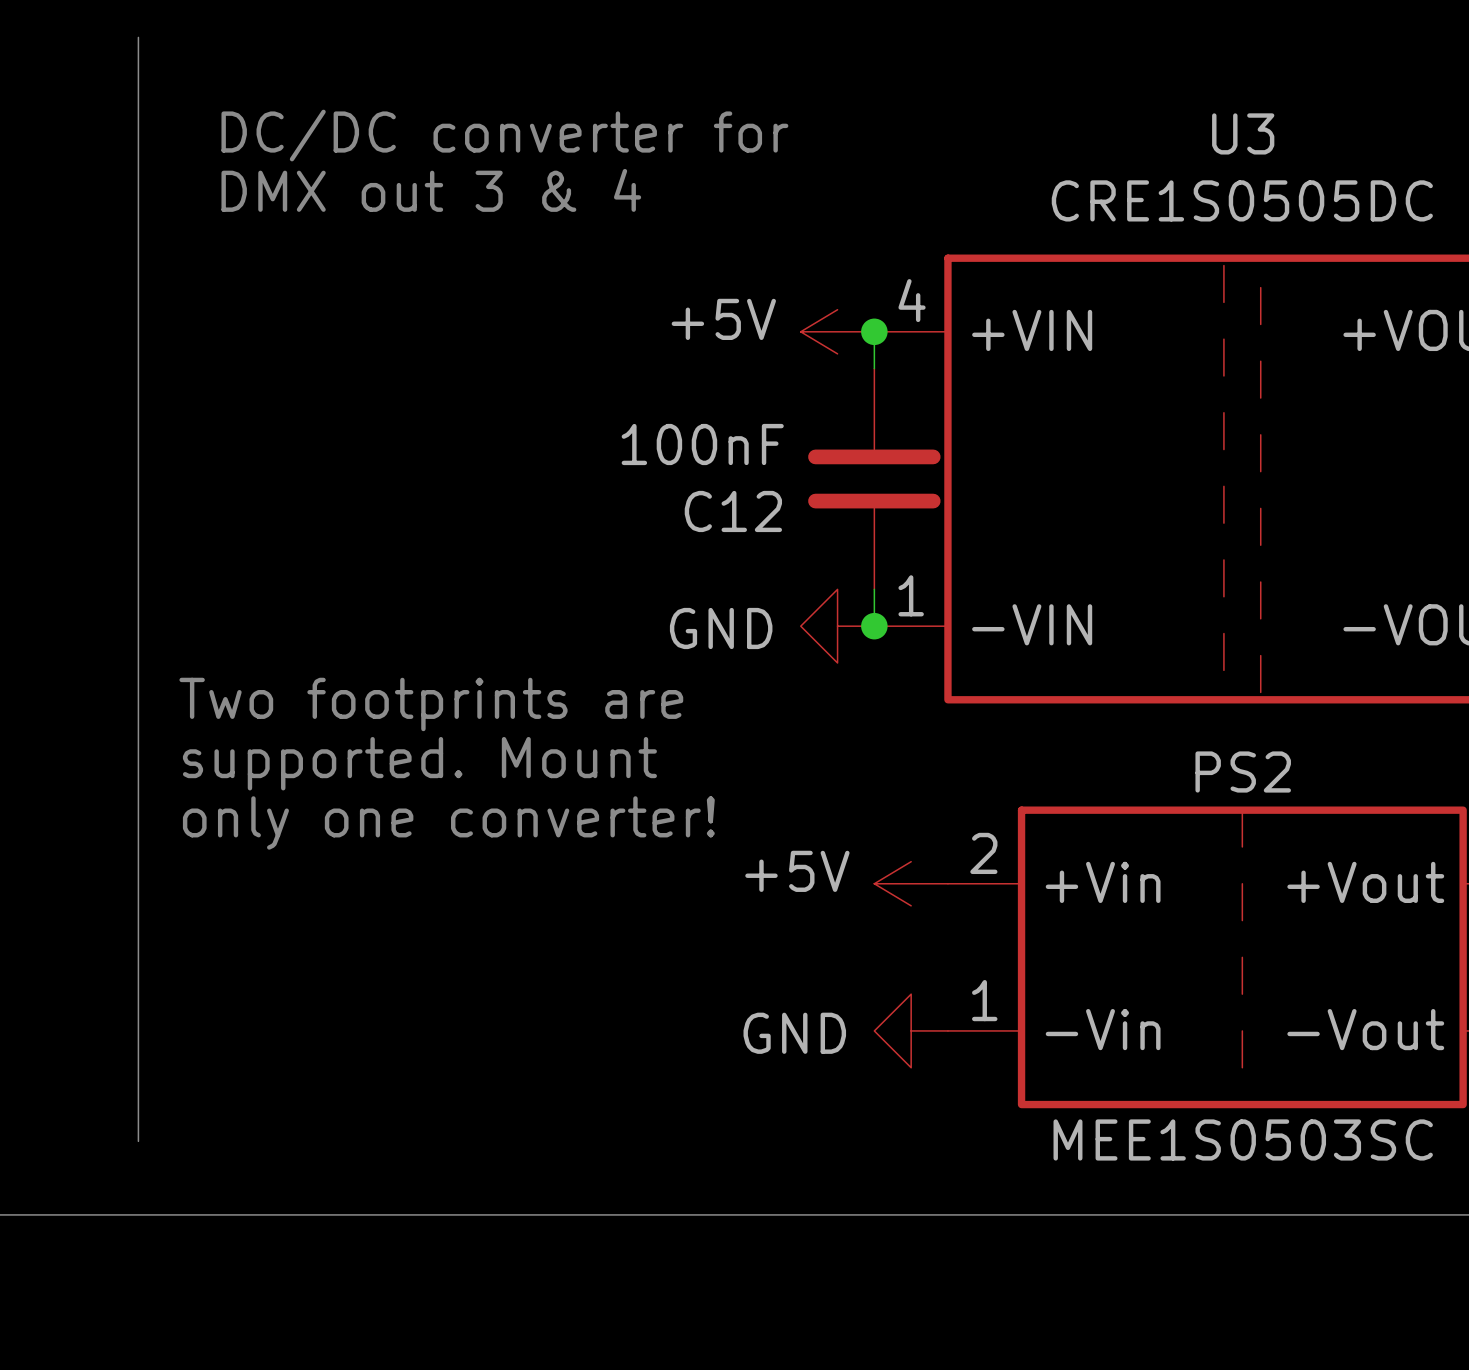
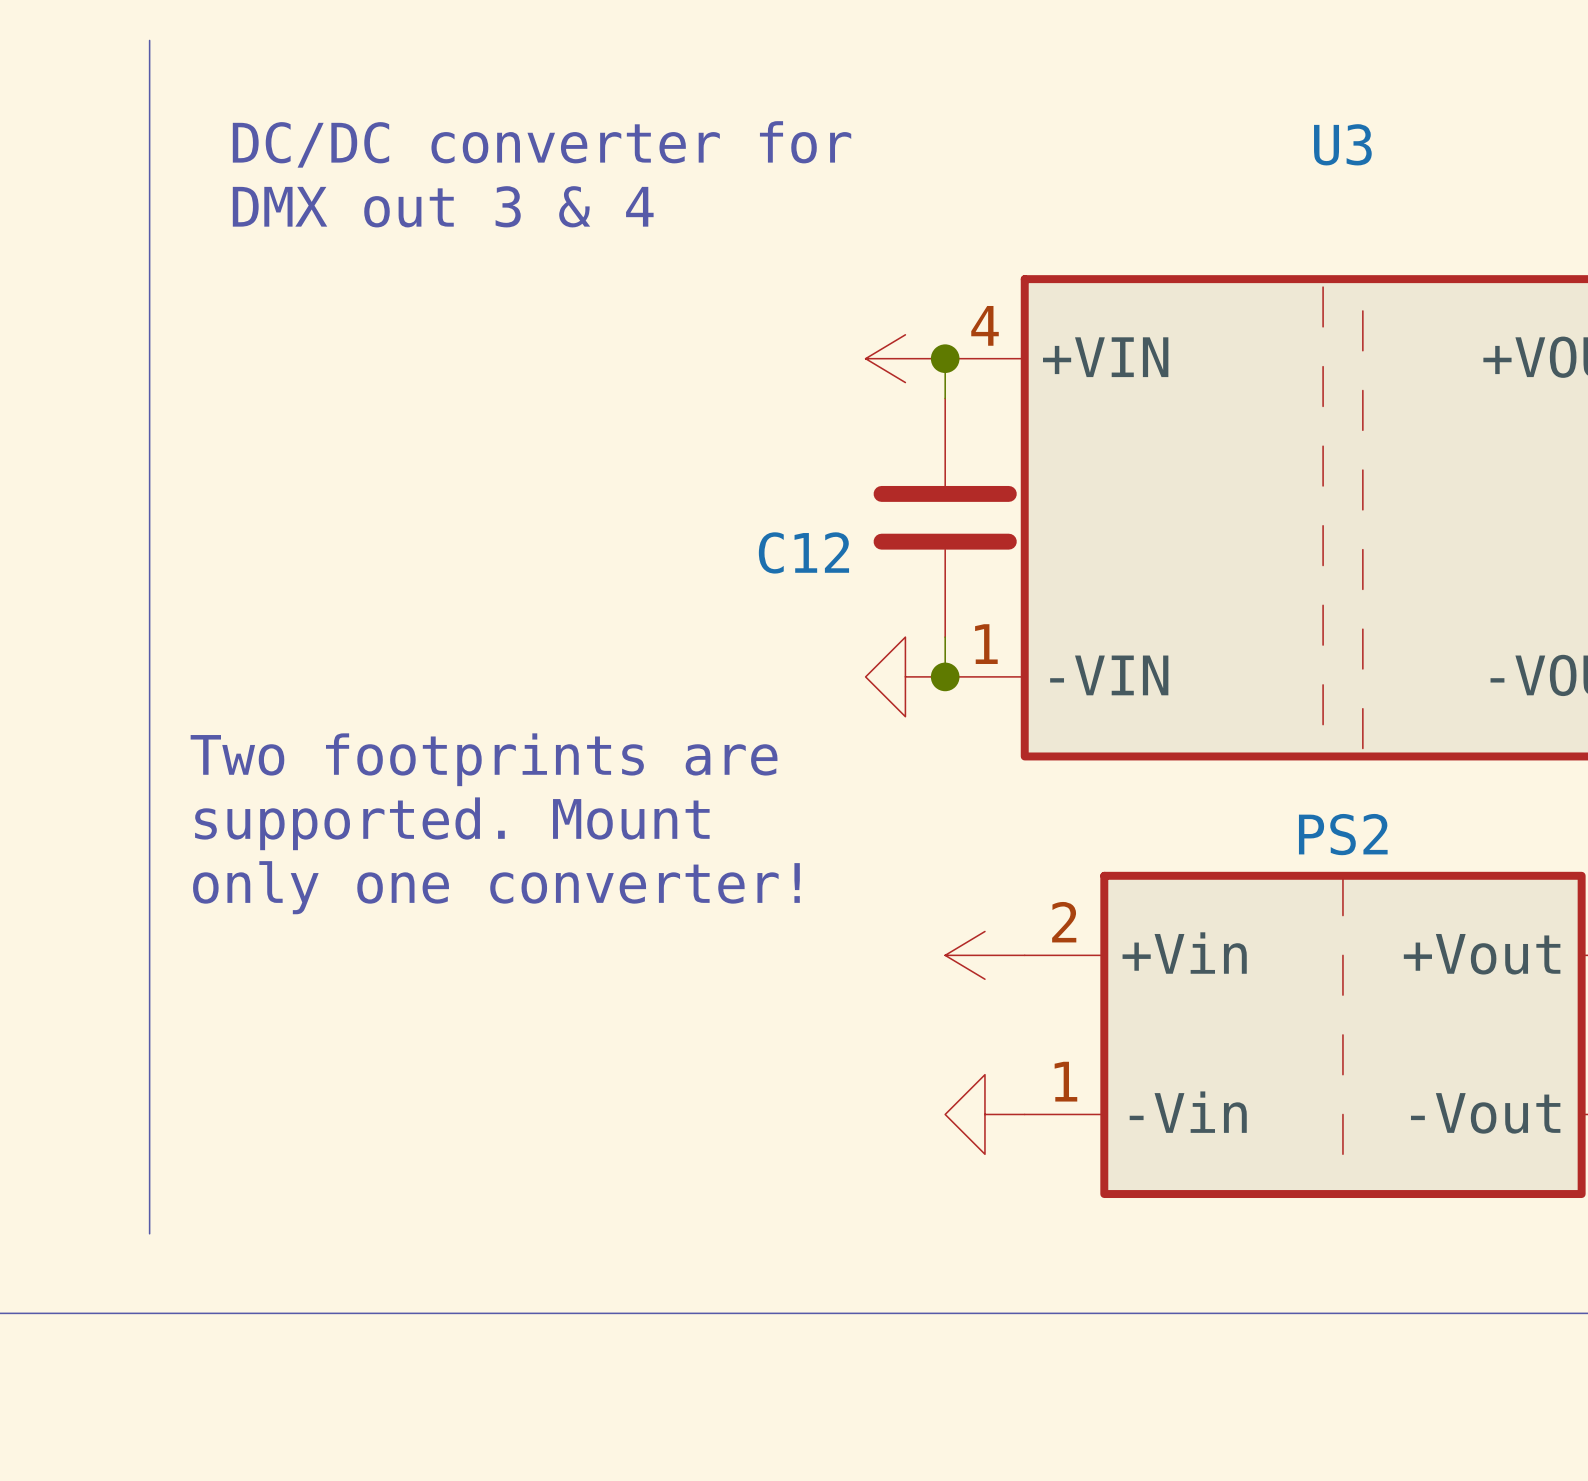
U3 value: CRE1S0505DC (1242, 200) -> none
power symbol text: +5V (723, 319) -> none
C12 value: 100nF (702, 444) -> none
power symbol text: GND (721, 628) -> none
power symbol text: +5V (797, 871) -> none
power symbol text: GND (794, 1033) -> none
PS2 value: MEE1S0503SC (1243, 1139) -> none

